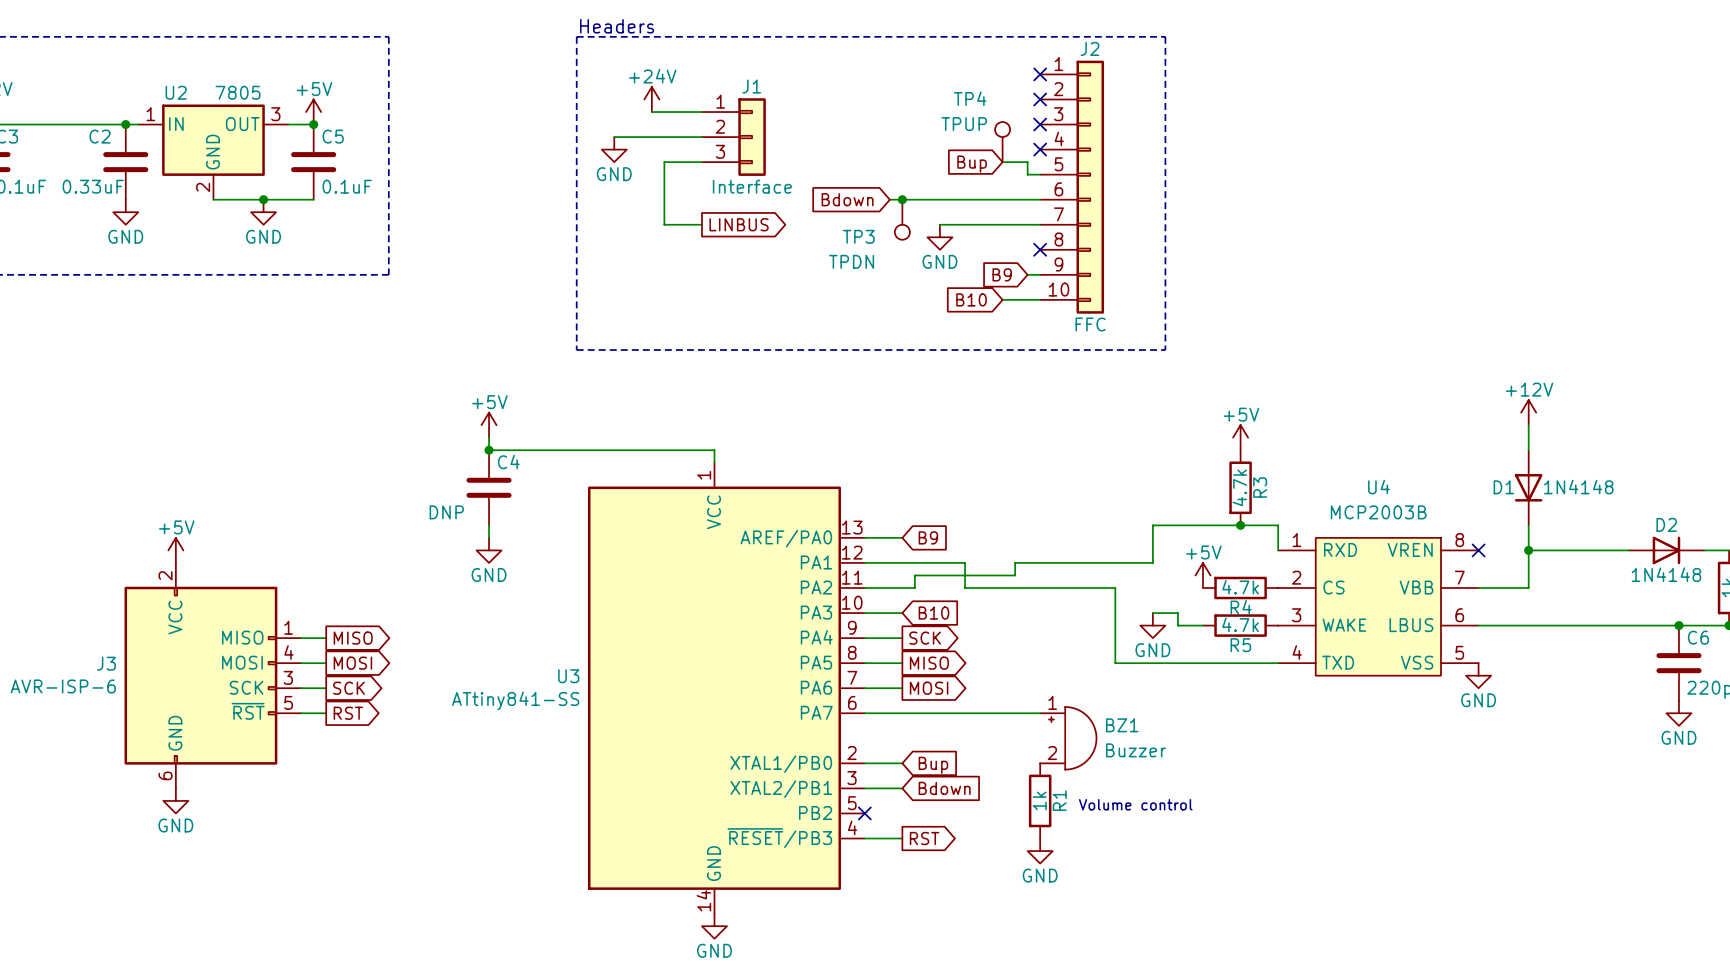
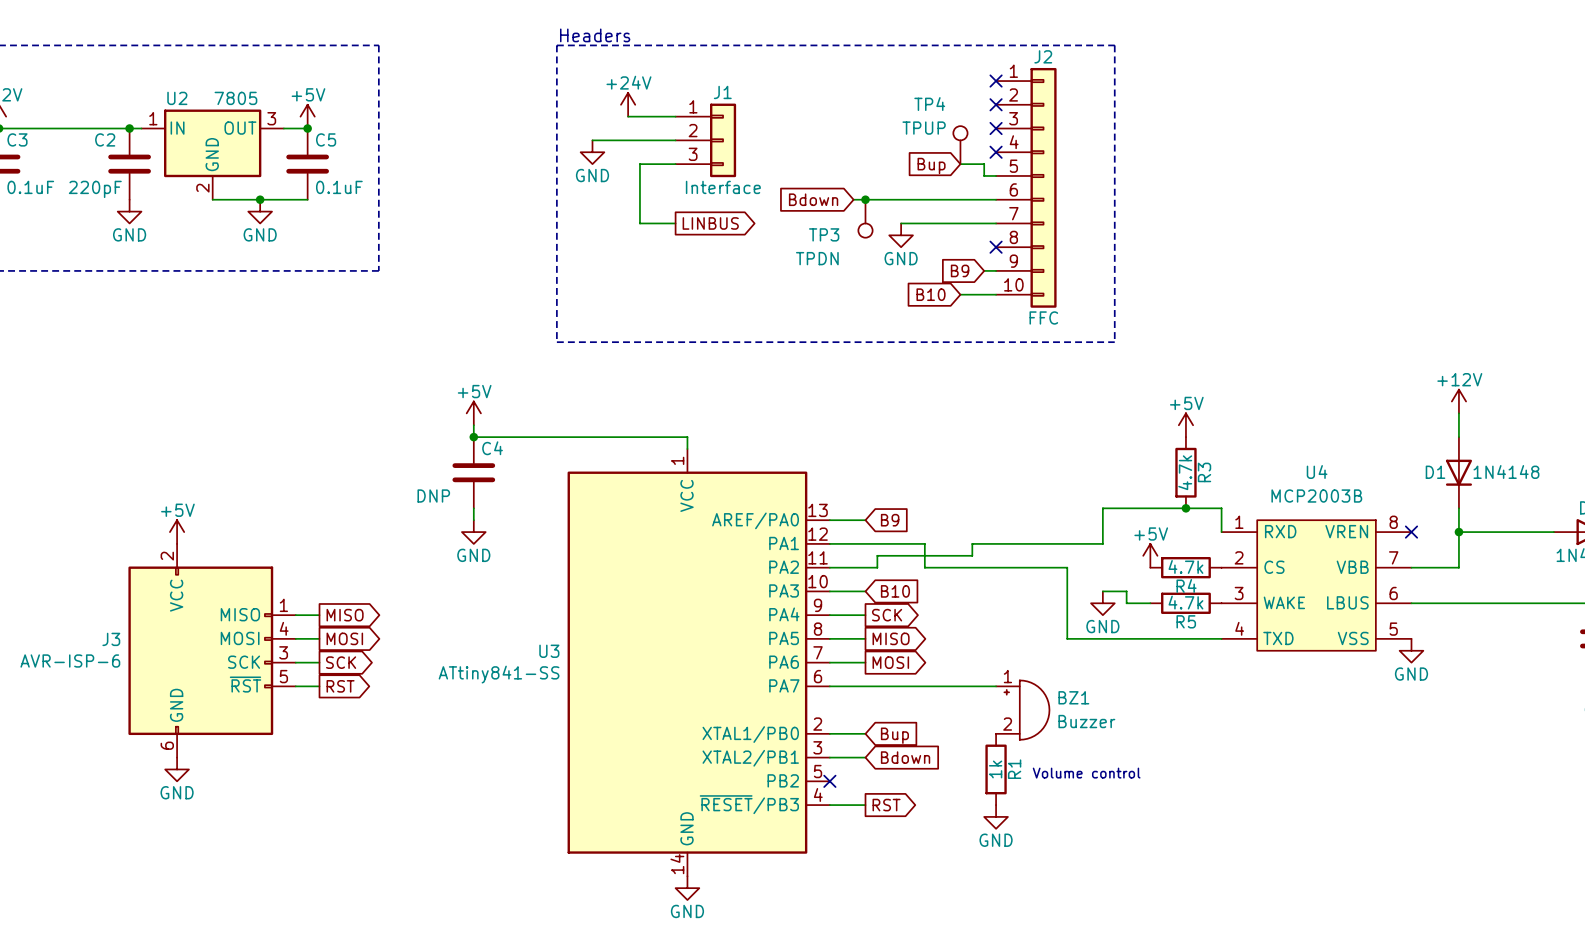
C2 value: 0.33uF (93, 186) -> 220pF (95, 189)

